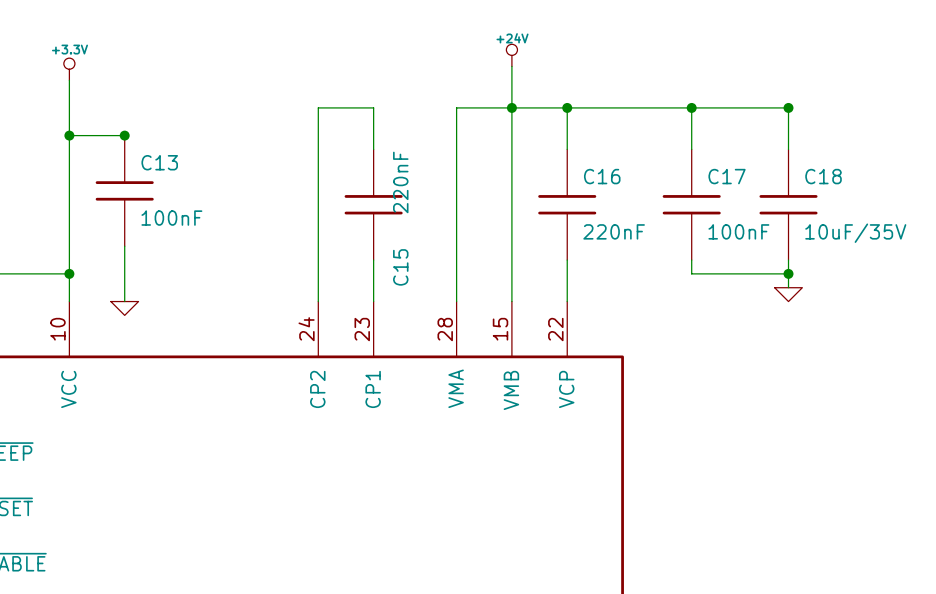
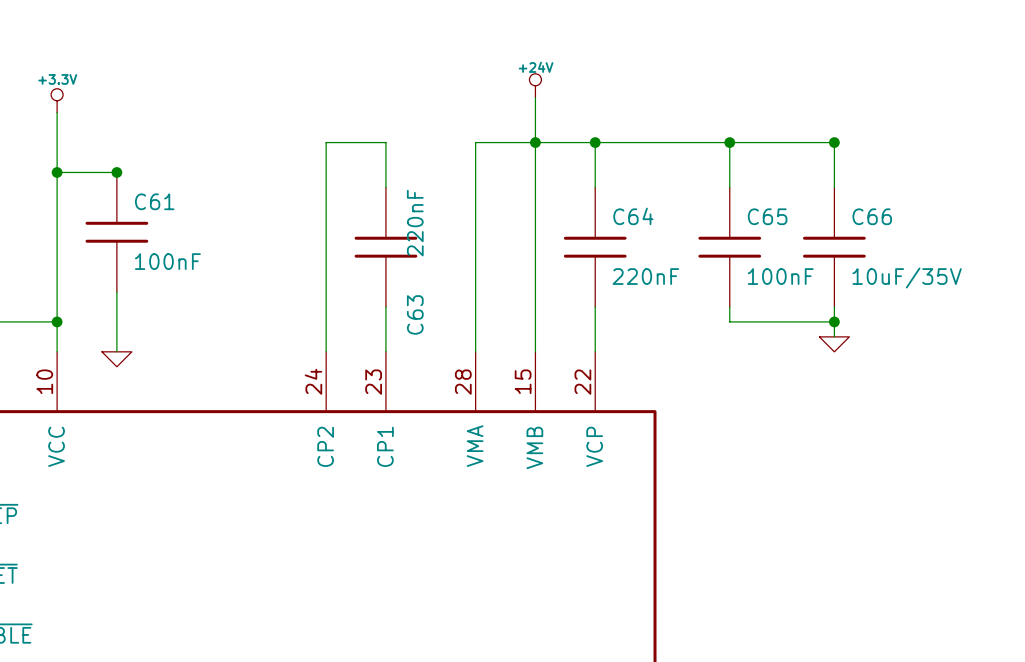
C13 name: C13 (159, 162) -> C61 (154, 201)
C16 name: C16 (602, 176) -> C64 (633, 216)
C17 name: C17 (727, 176) -> C65 (767, 216)
C18 name: C18 (823, 176) -> C66 (872, 216)
C15 name: C15 (400, 267) -> C63 (415, 314)

